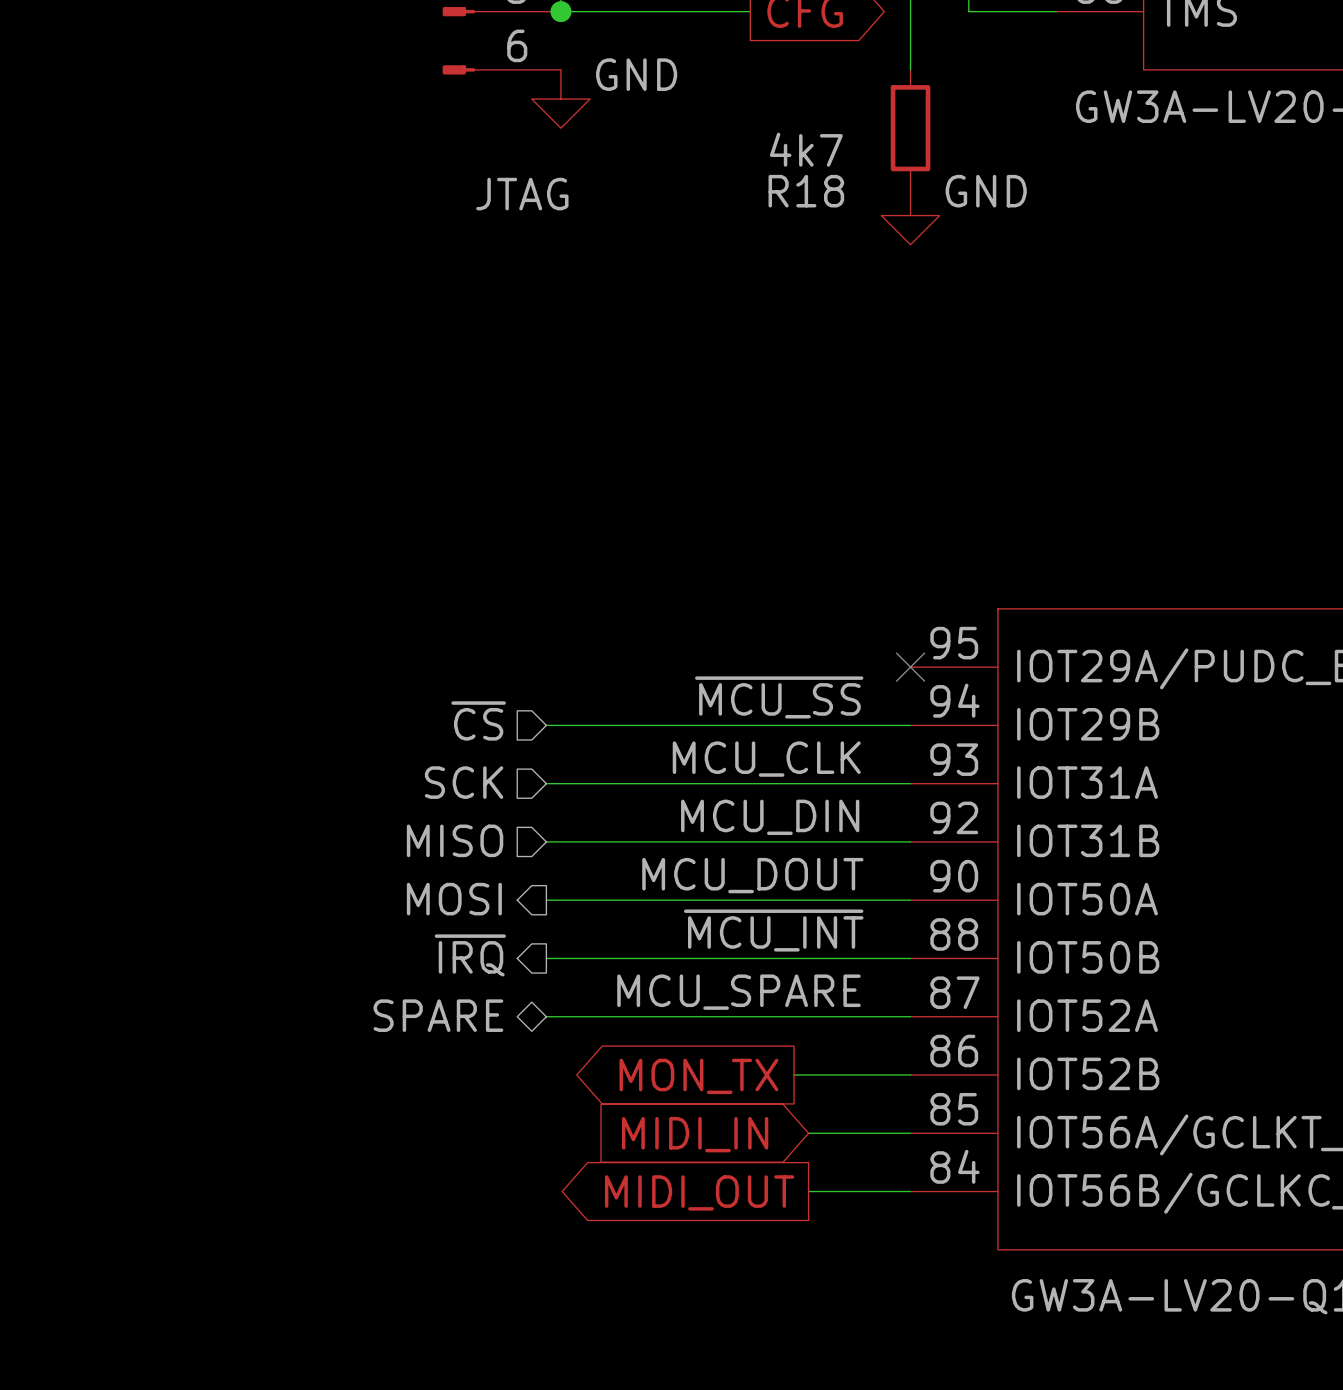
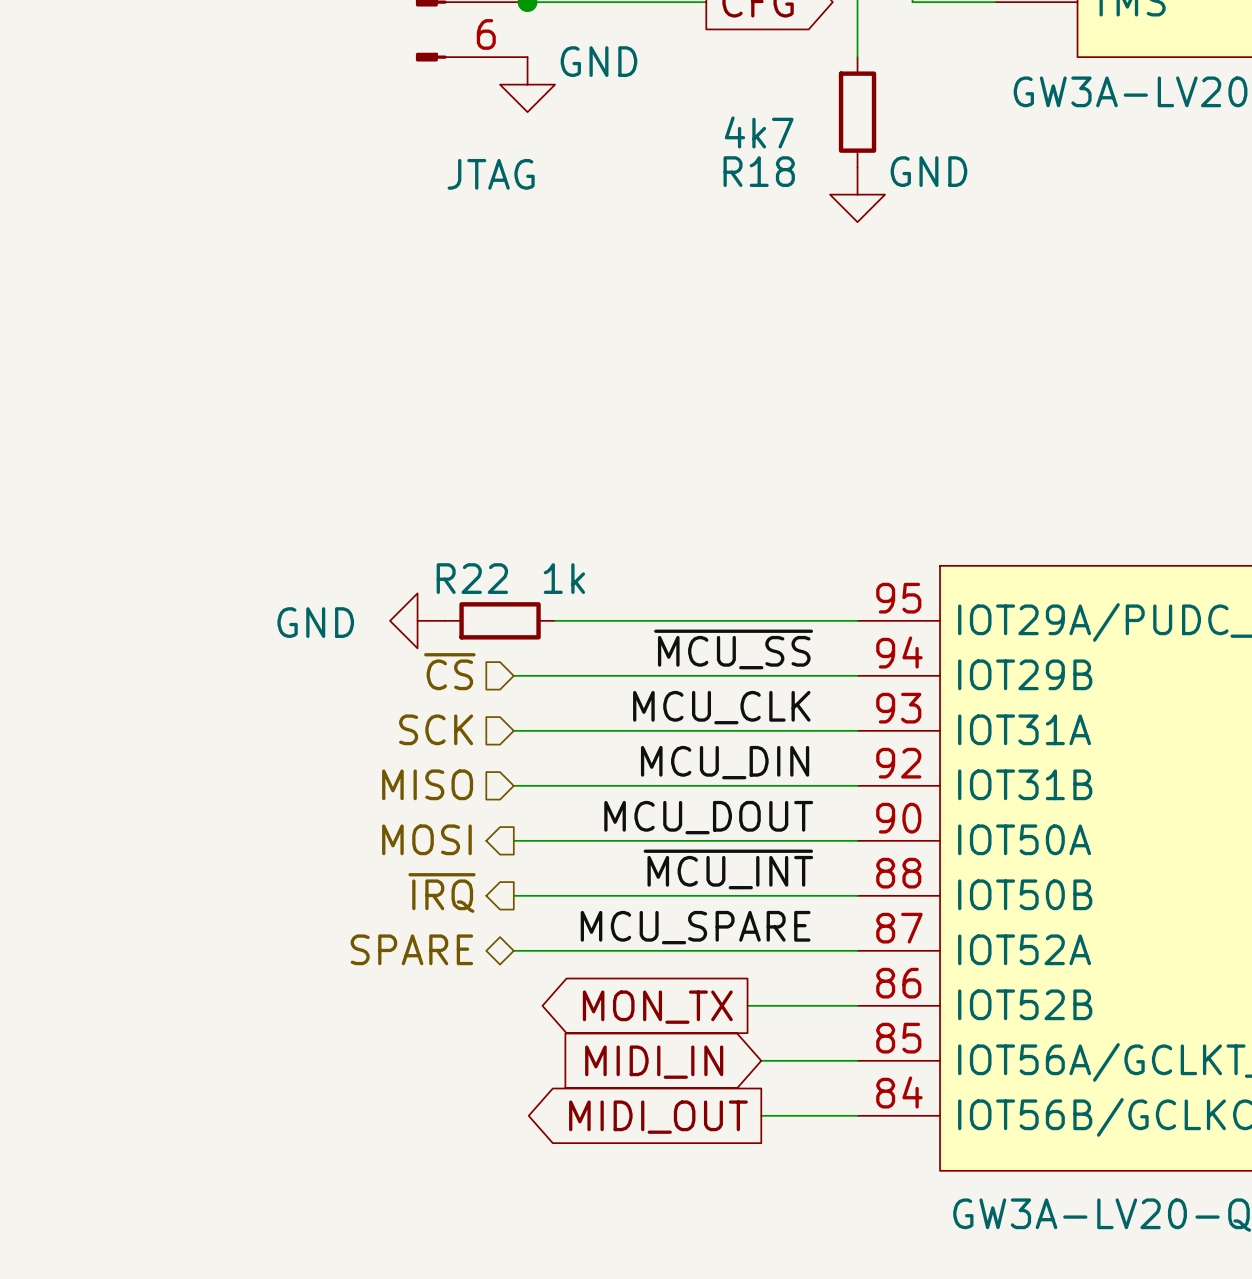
power symbol: none -> GND (417, 620)
R22: none -> 1k (500, 620)
wire: none -> (555, 620) (857, 620)
no-connect mark: (910, 667) -> none

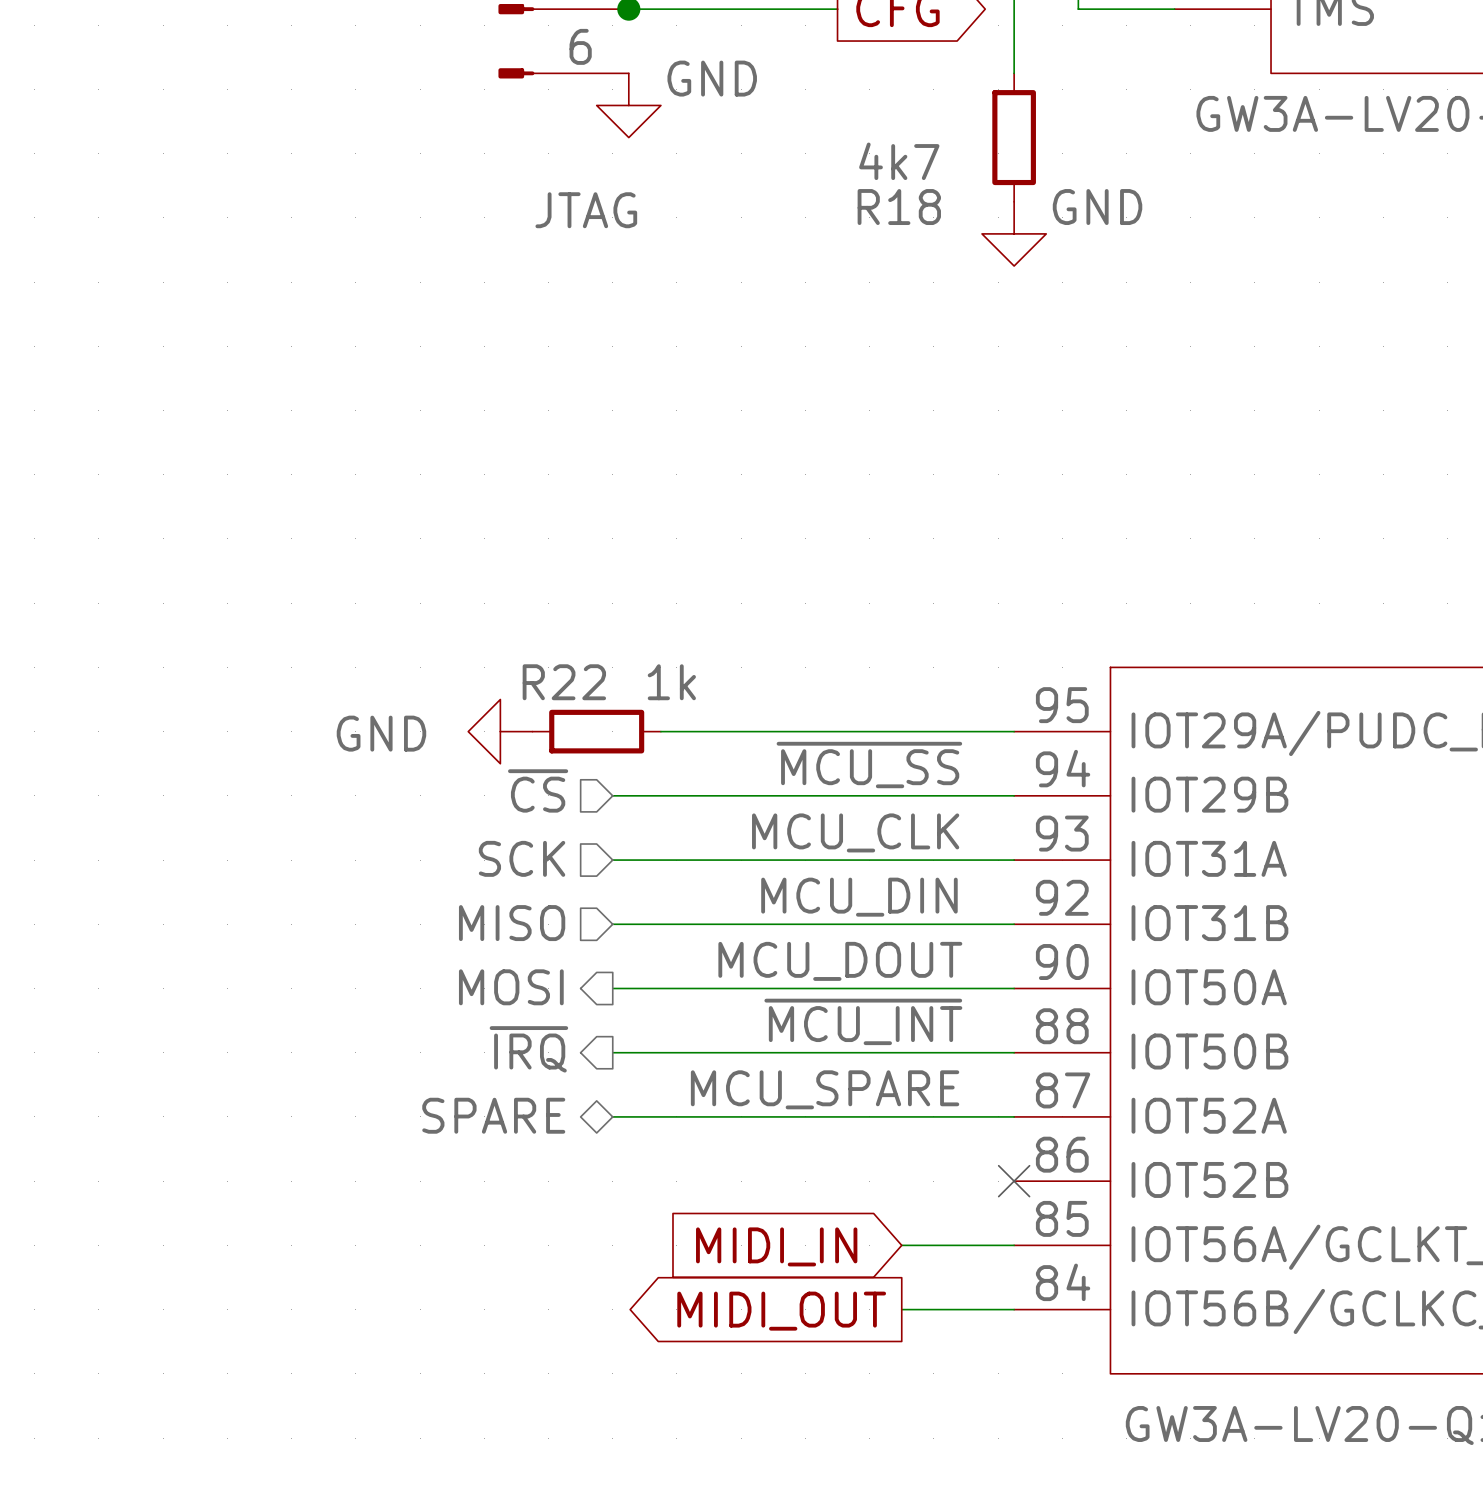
wire: (747, 1005) (857, 1005) -> none
no-connect mark: none -> (1014, 1181)
global label: MON_TX (657, 1007) -> none

